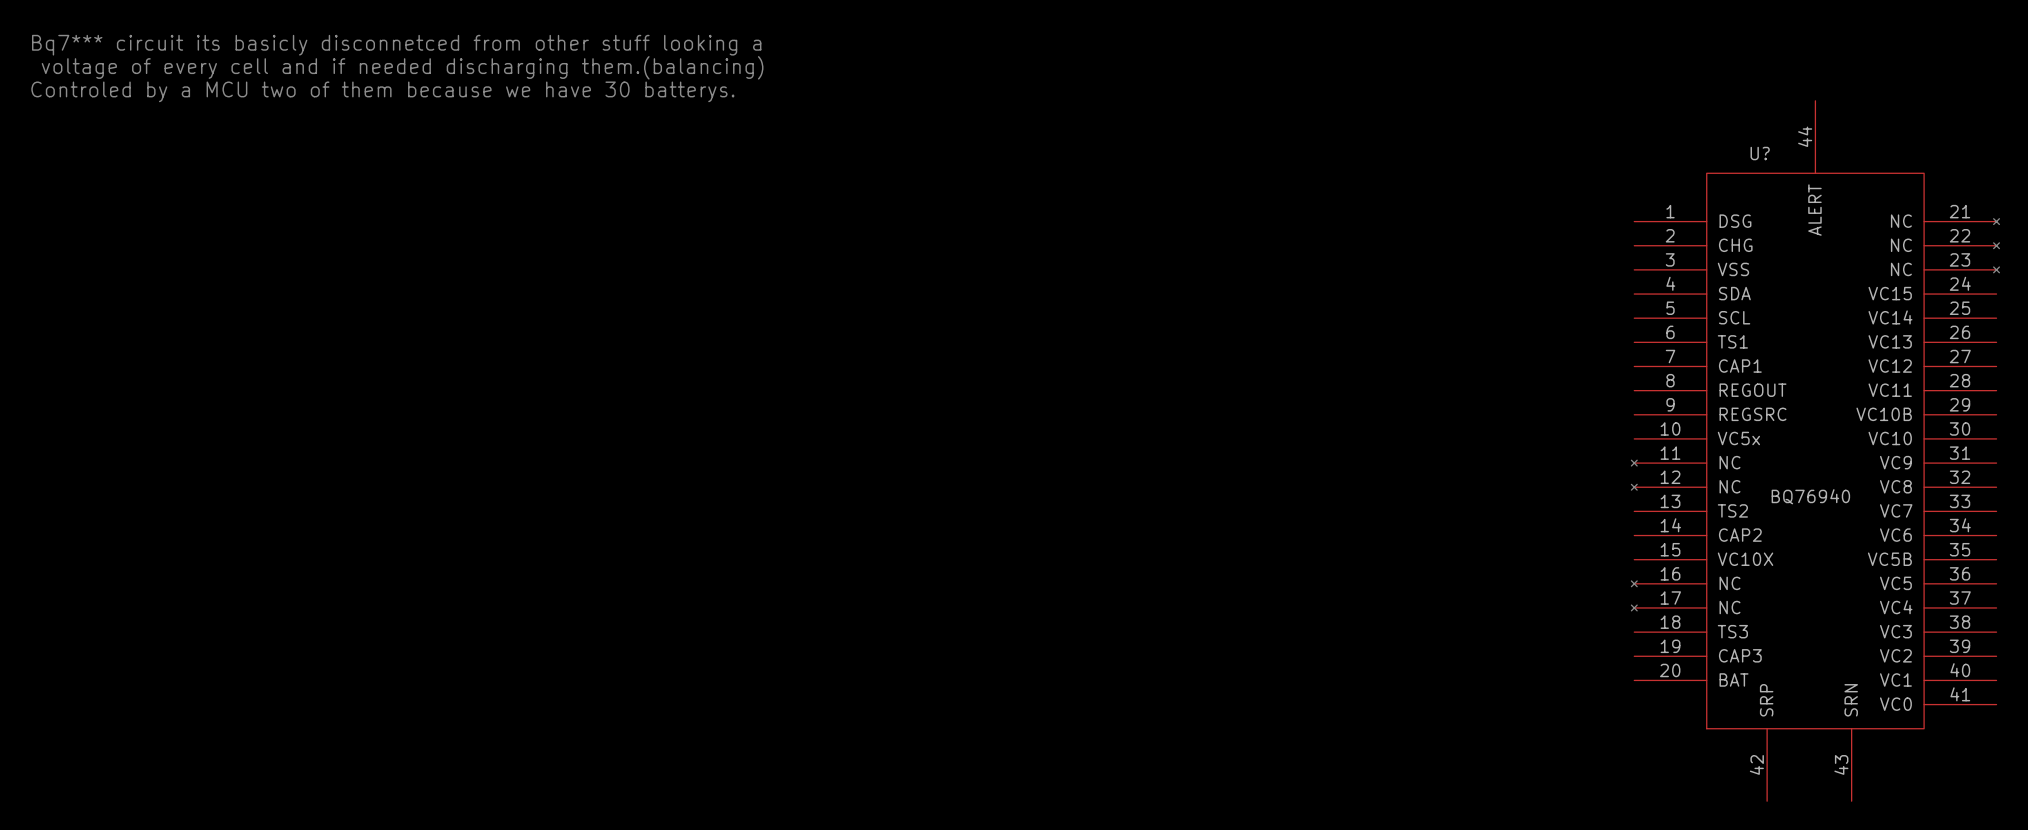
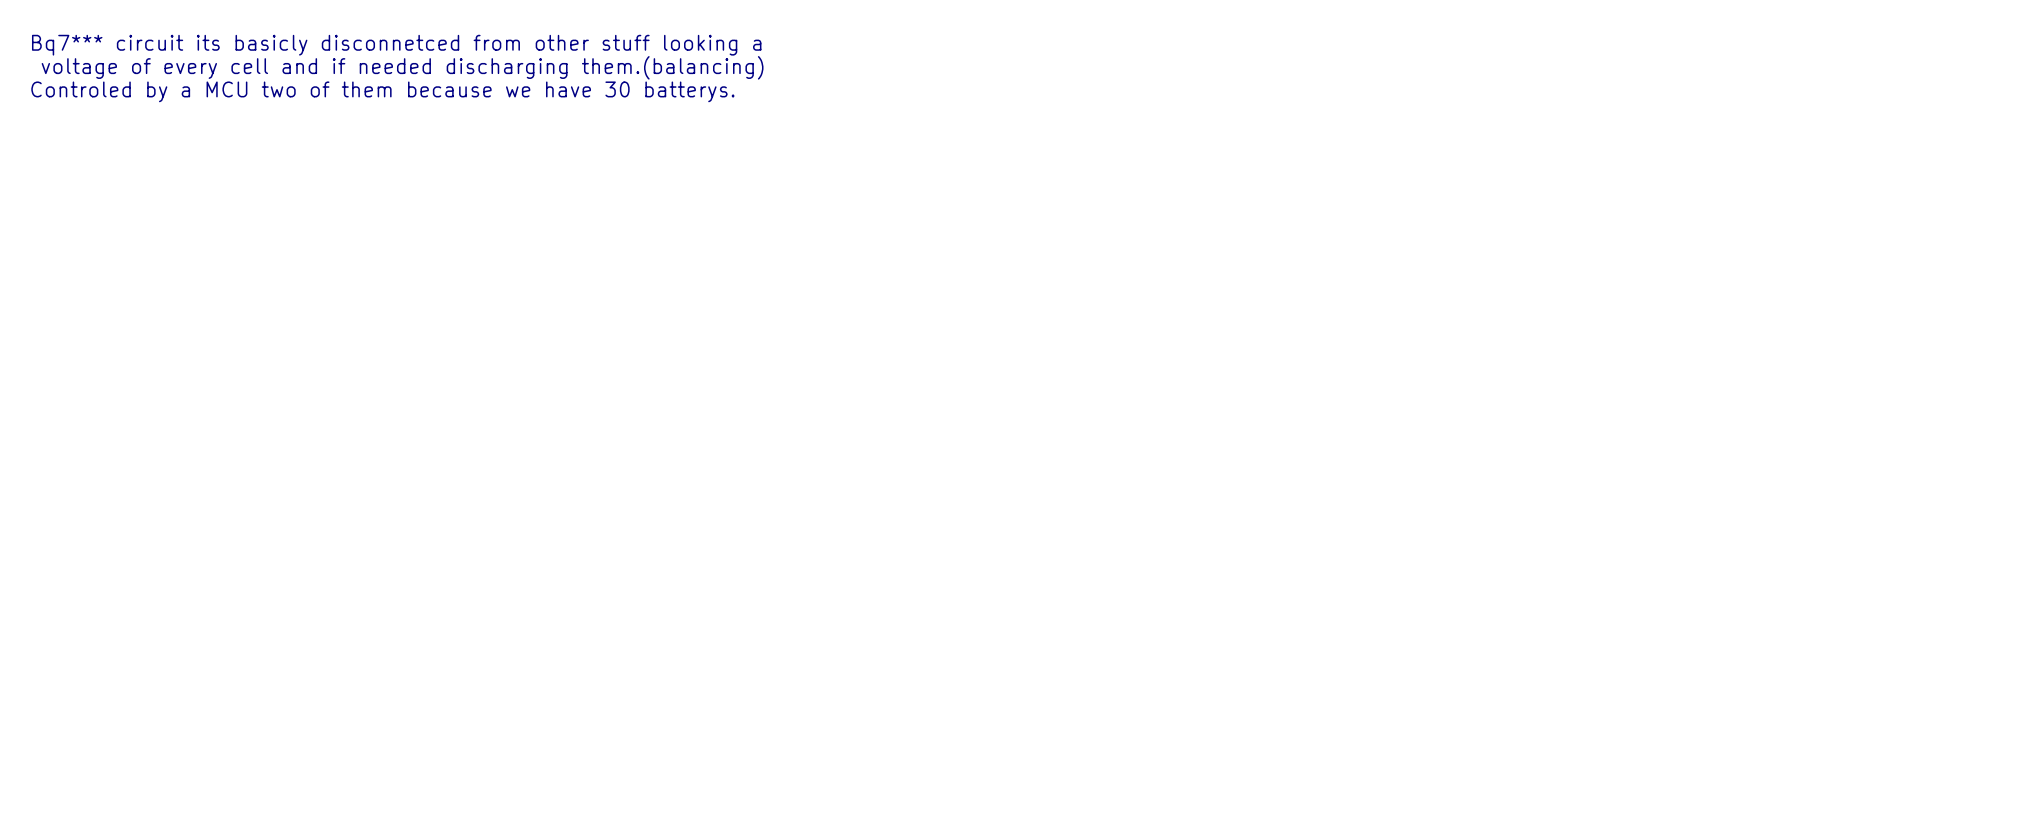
U?: BQ76940 (1815, 451) -> none

